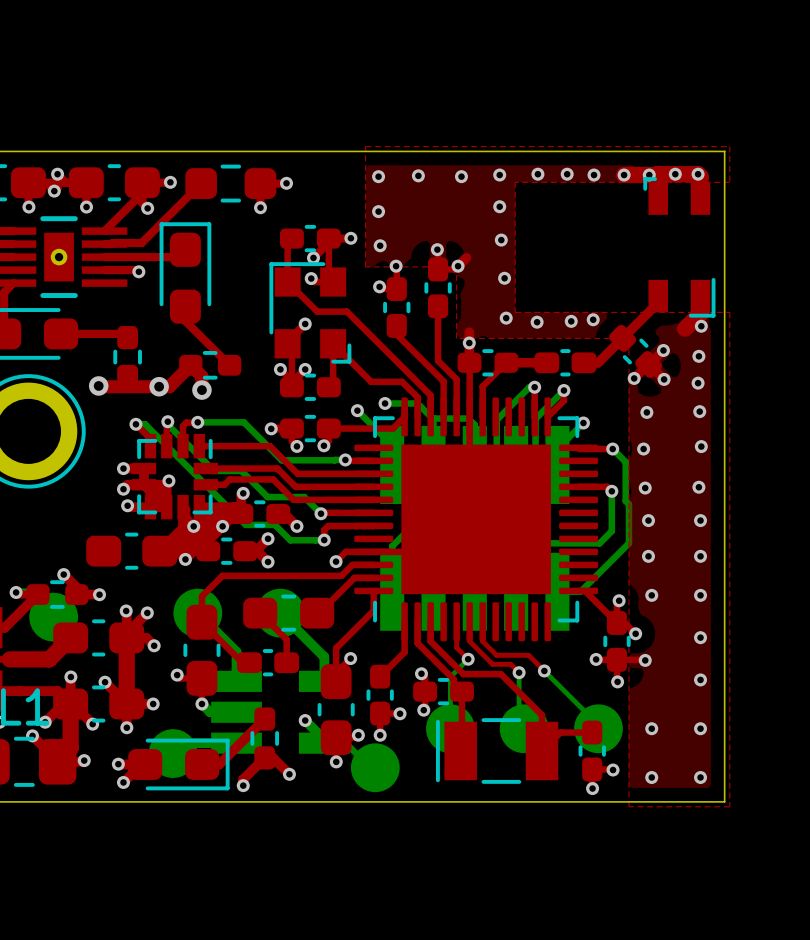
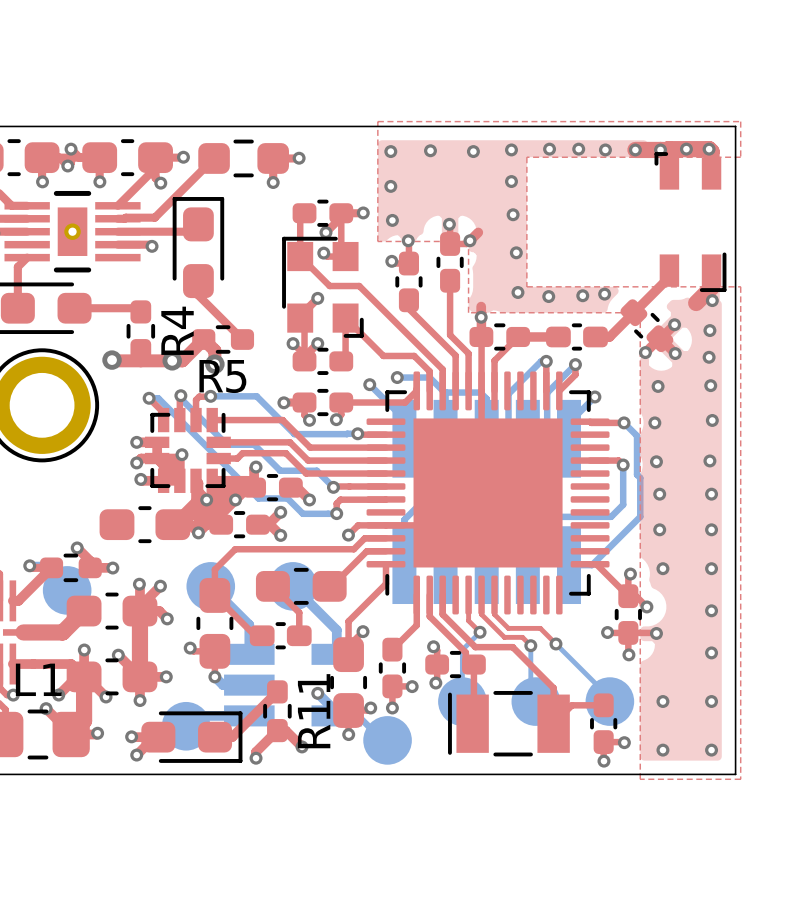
R4 name: none -> R4 (177, 330)
R5 name: none -> R5 (222, 376)
R11 name: none -> R11 (314, 711)

